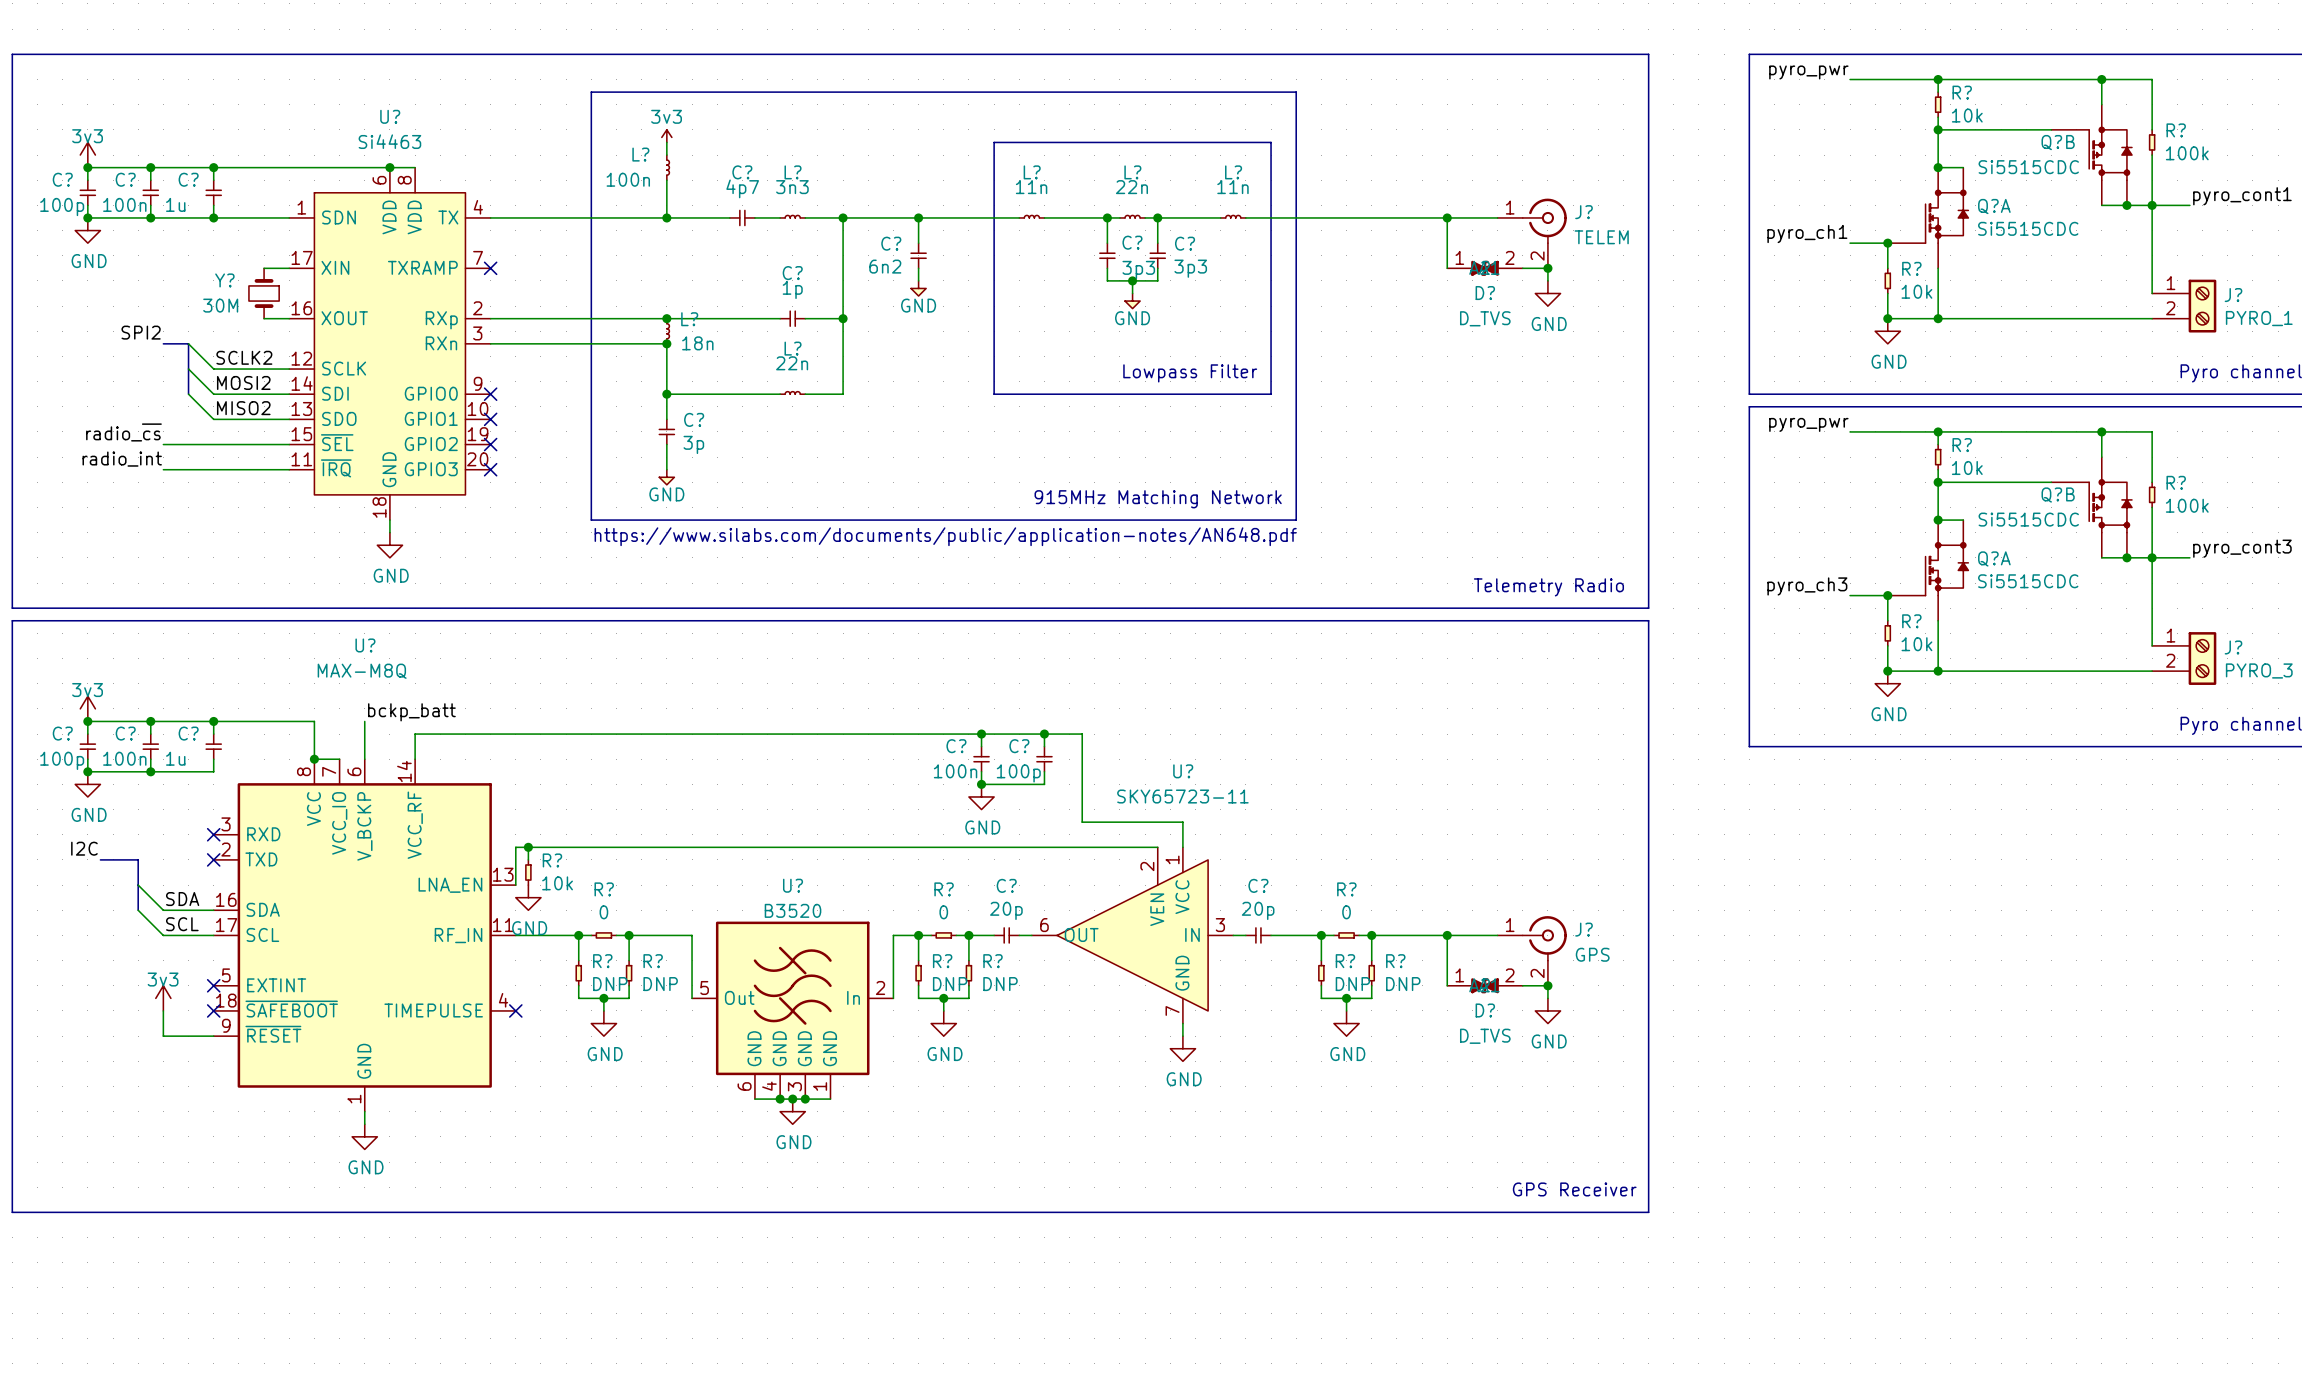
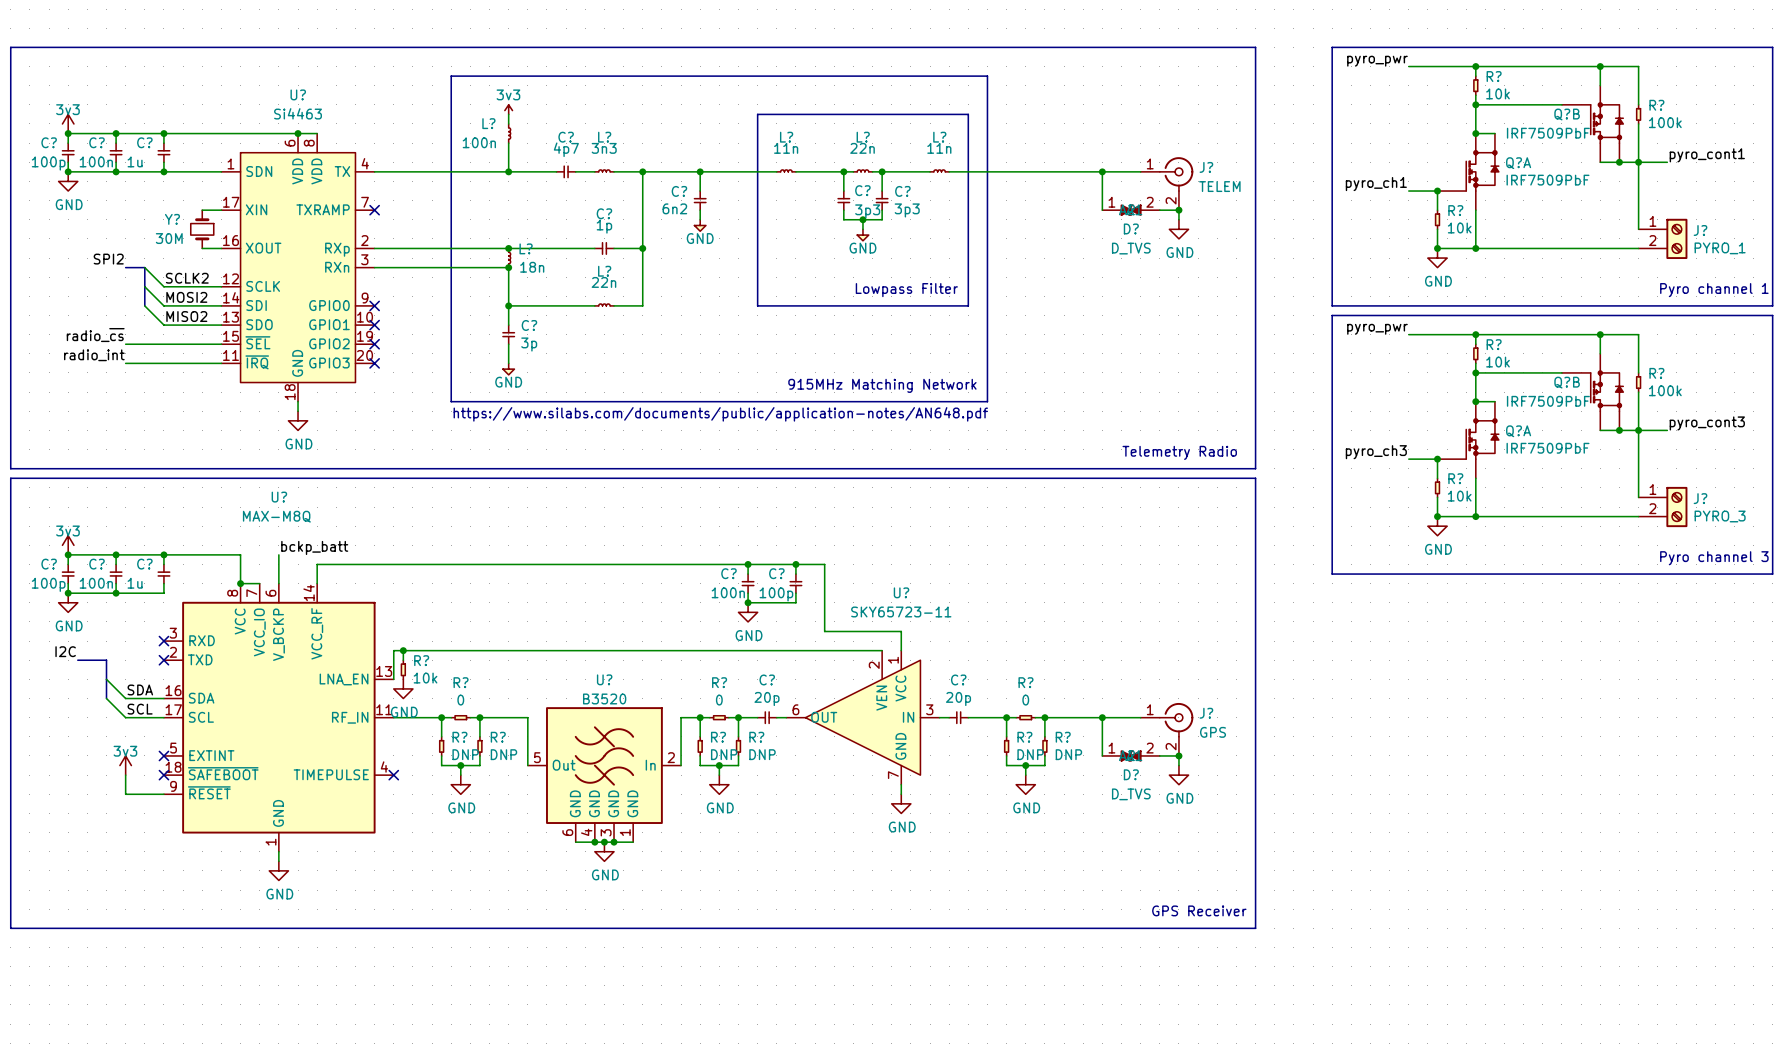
Q?B value: Si5515CDC (2028, 167) -> IRF7509PbF (1548, 133)
Q?A value: Si5515CDC (2028, 228) -> IRF7509PbF (1548, 180)
Q?B value: Si5515CDC (2028, 519) -> IRF7509PbF (1548, 401)
Q?A value: Si5515CDC (2028, 581) -> IRF7509PbF (1548, 448)

